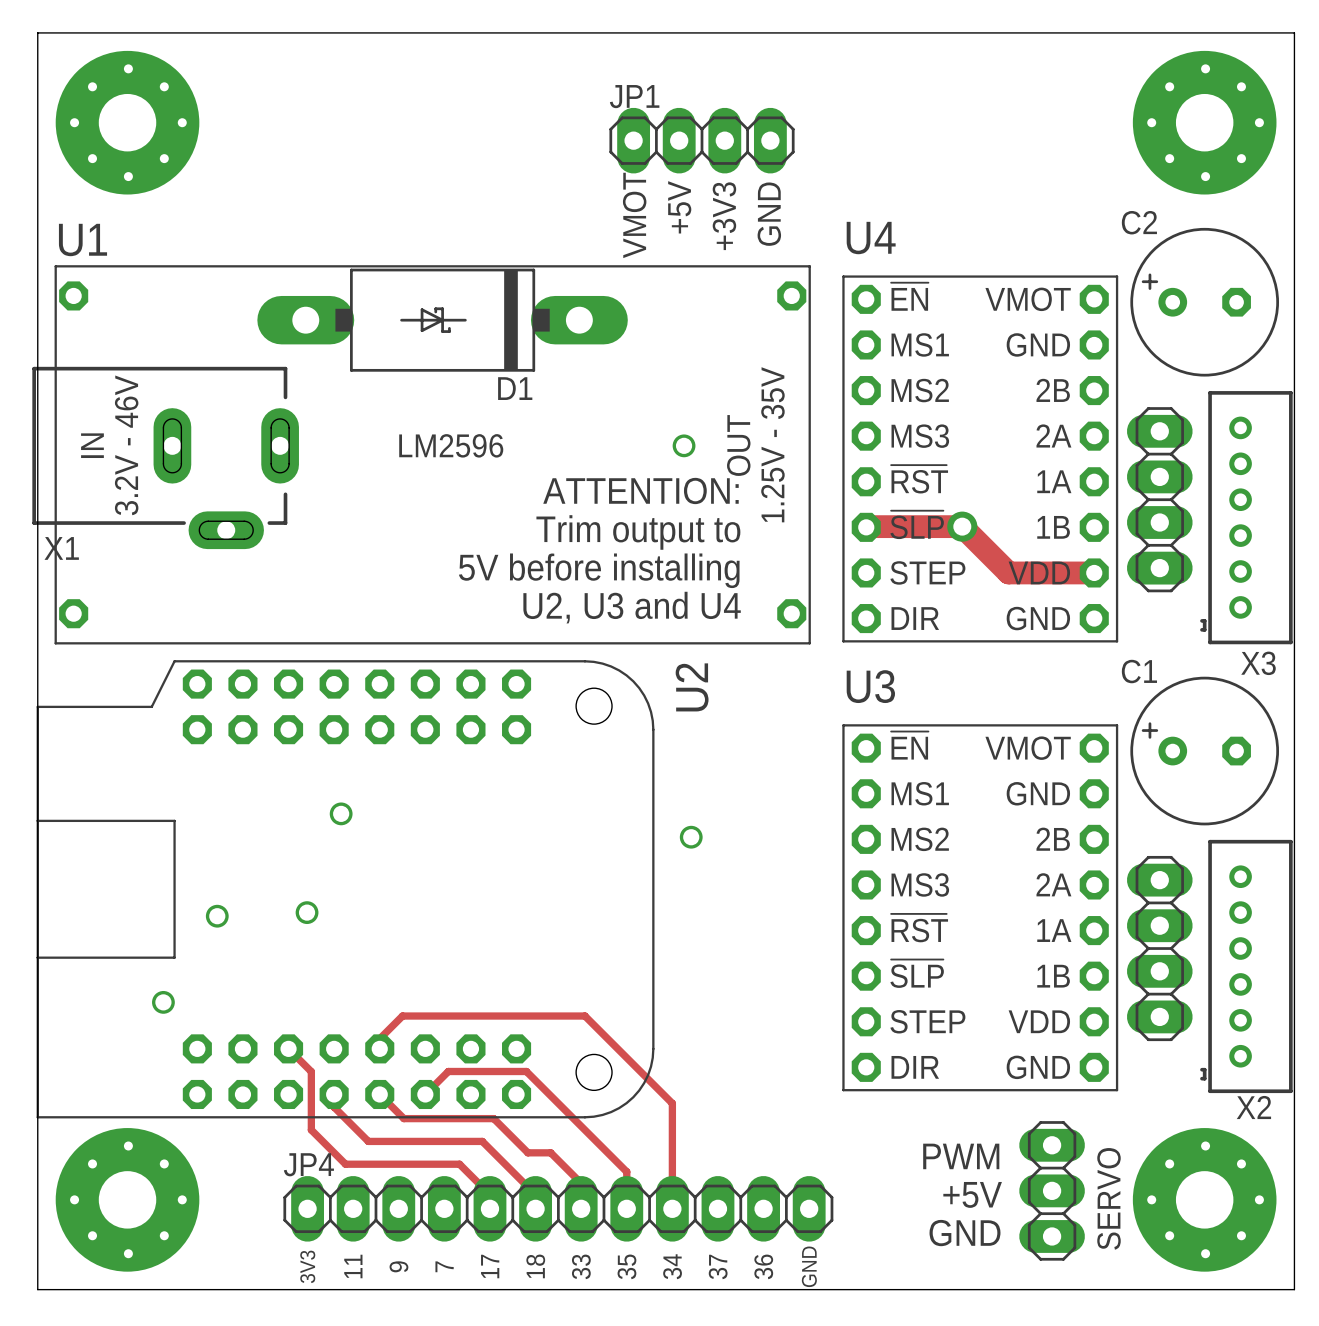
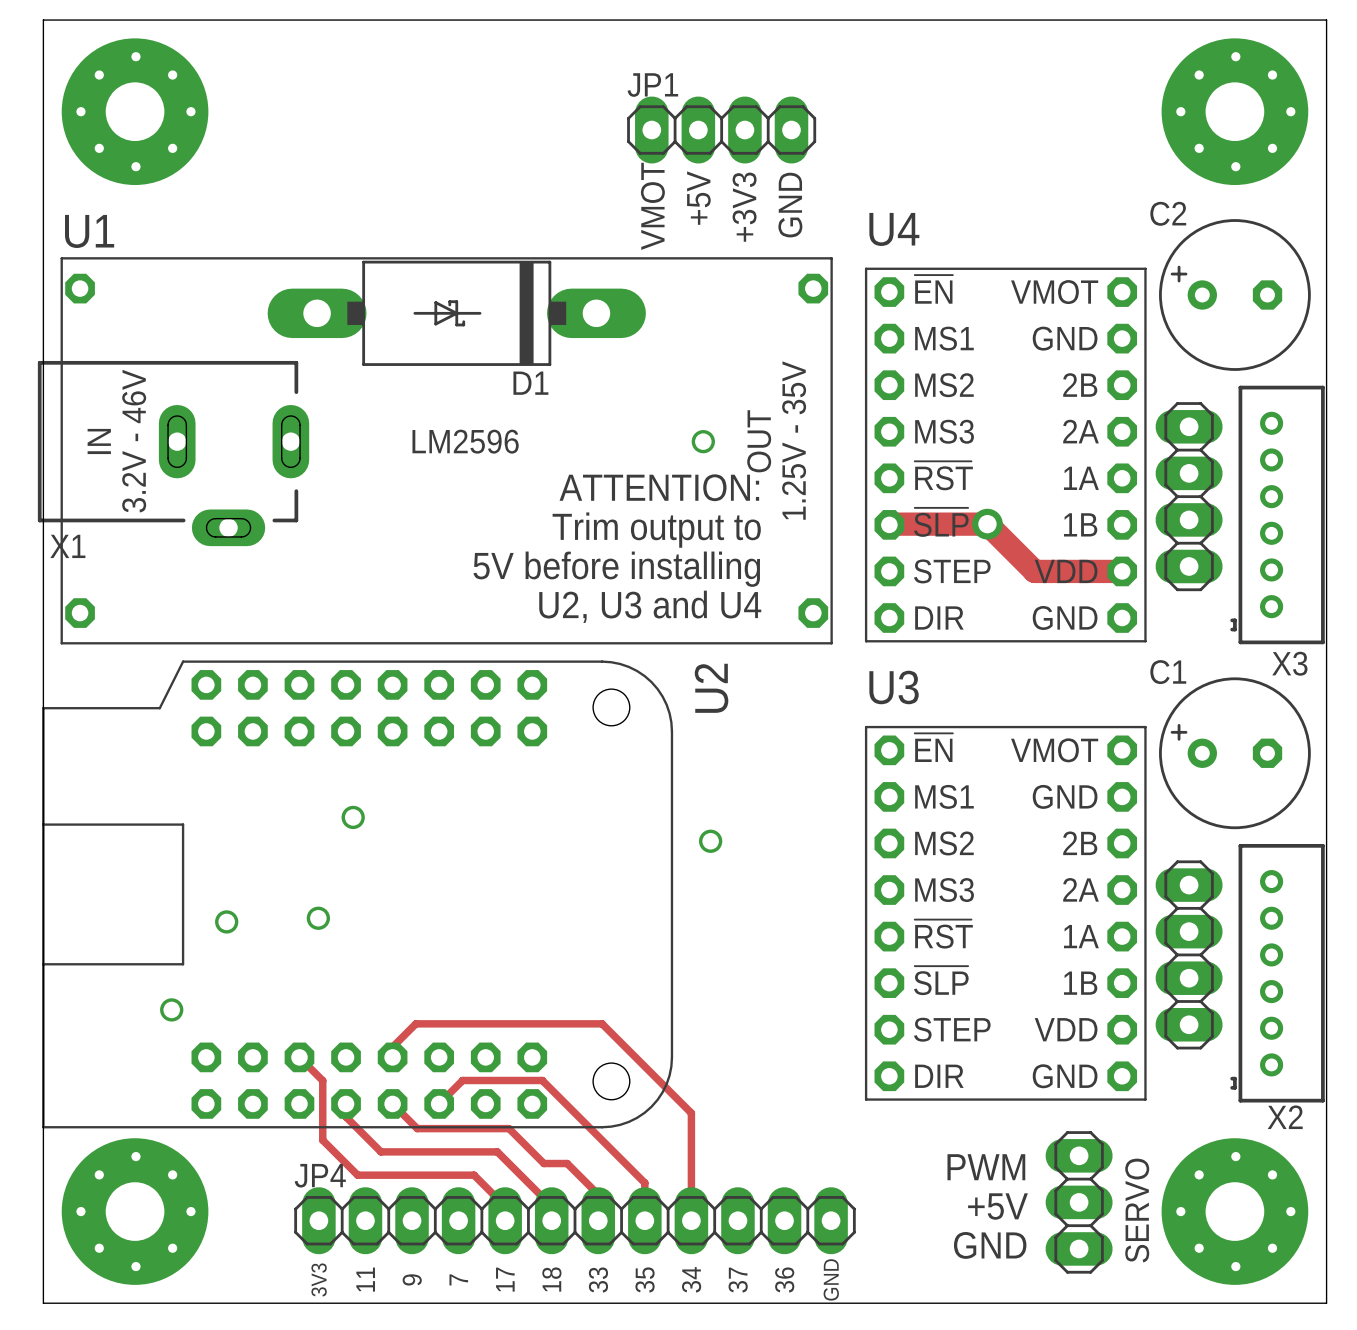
X1 footprint: [32, 366, 299, 550] -> [37, 360, 310, 547]

